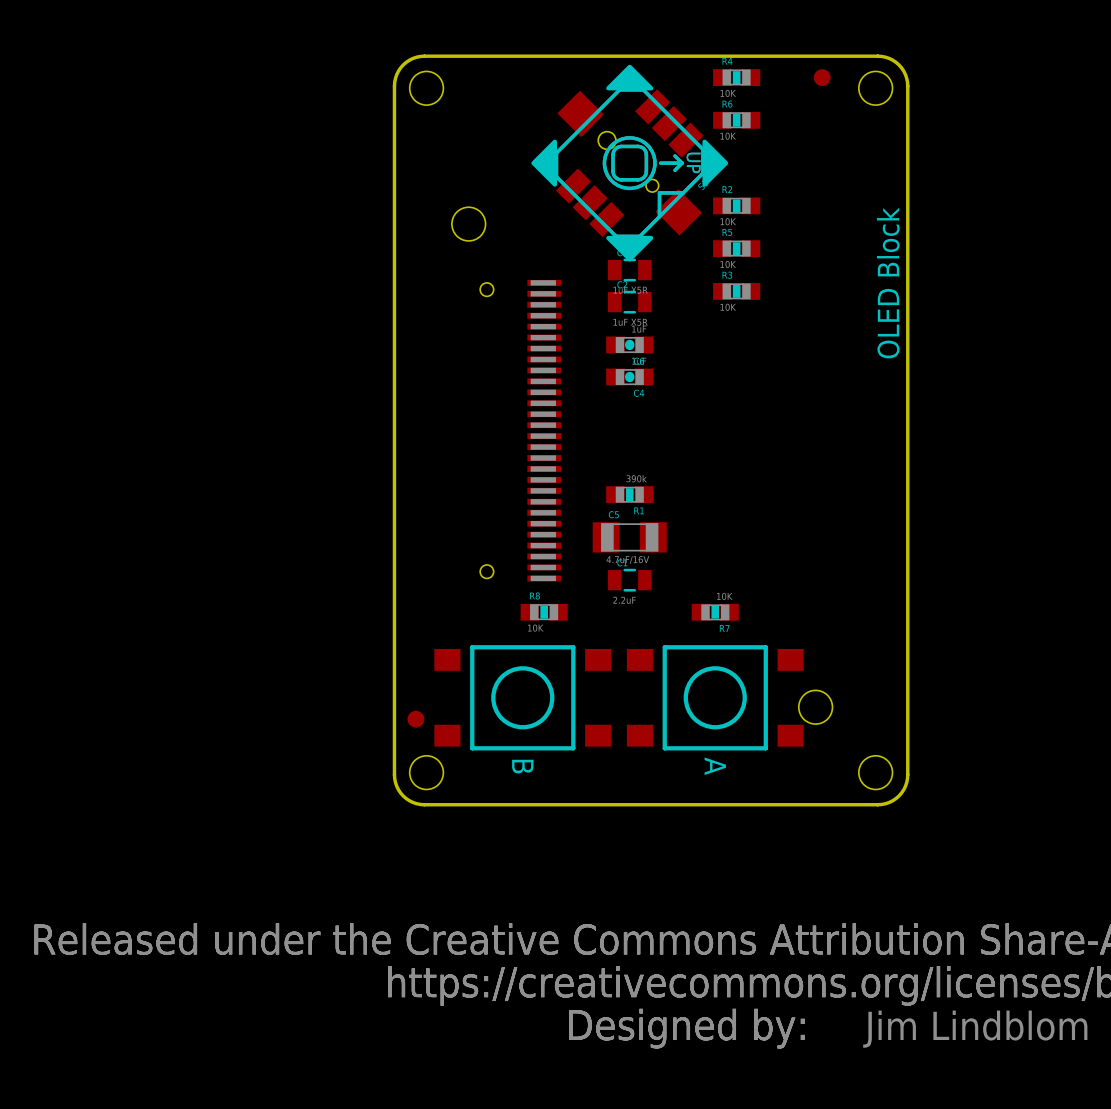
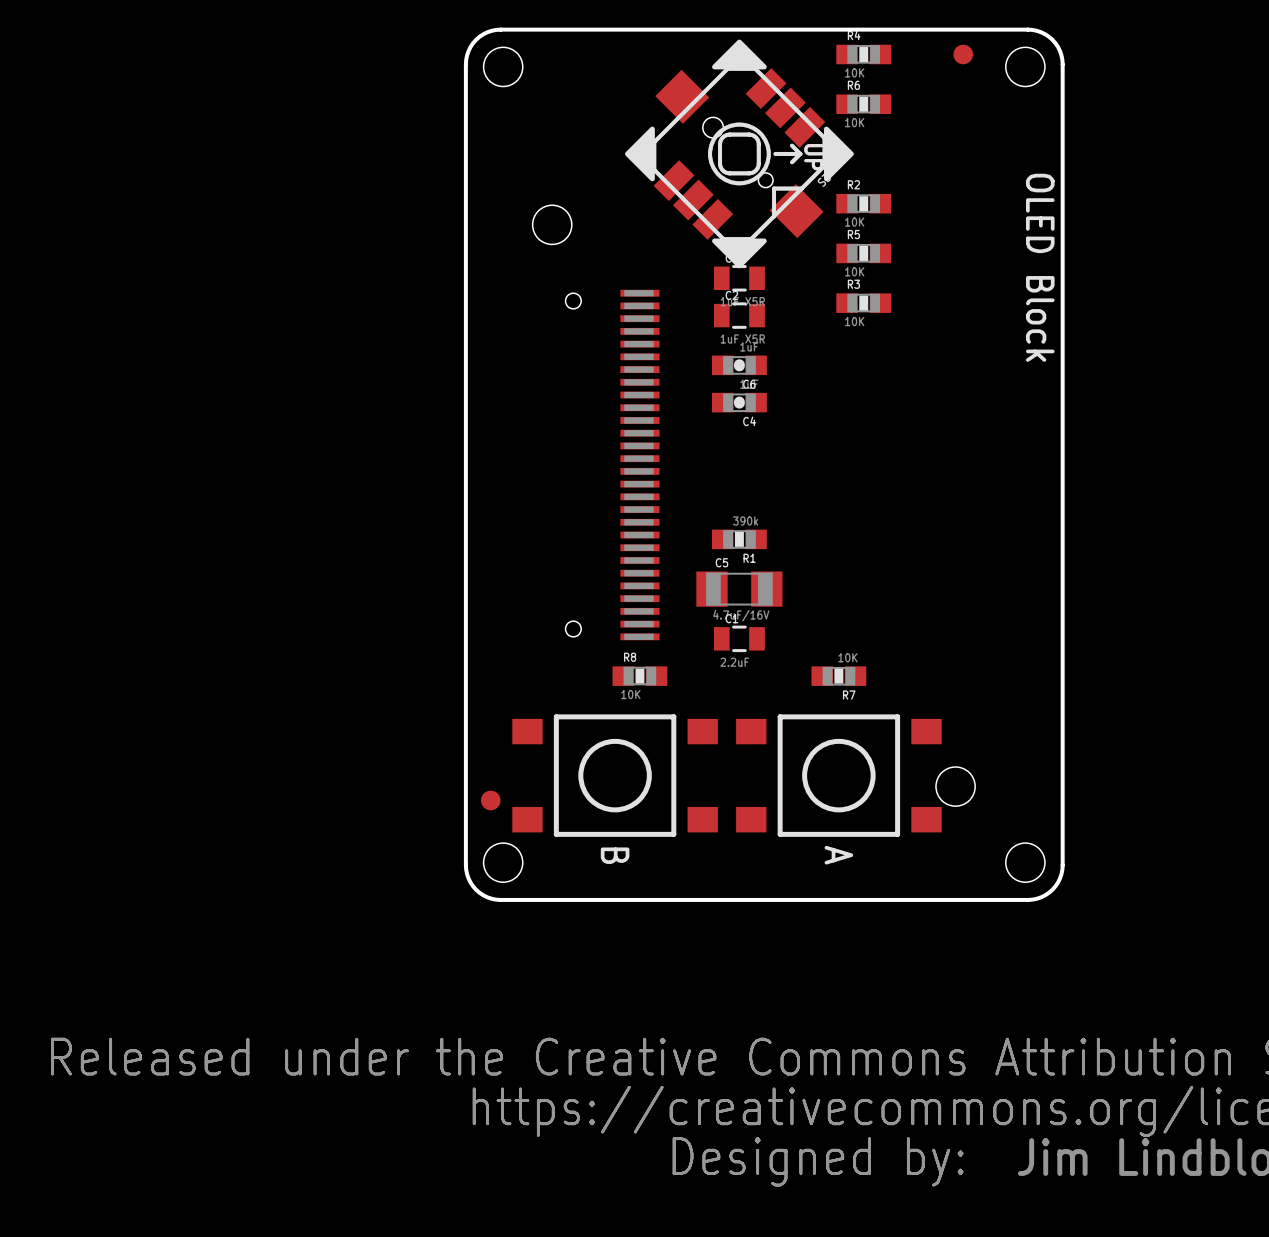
text rotation: 0° (888, 283) -> 180° (1040, 267)

